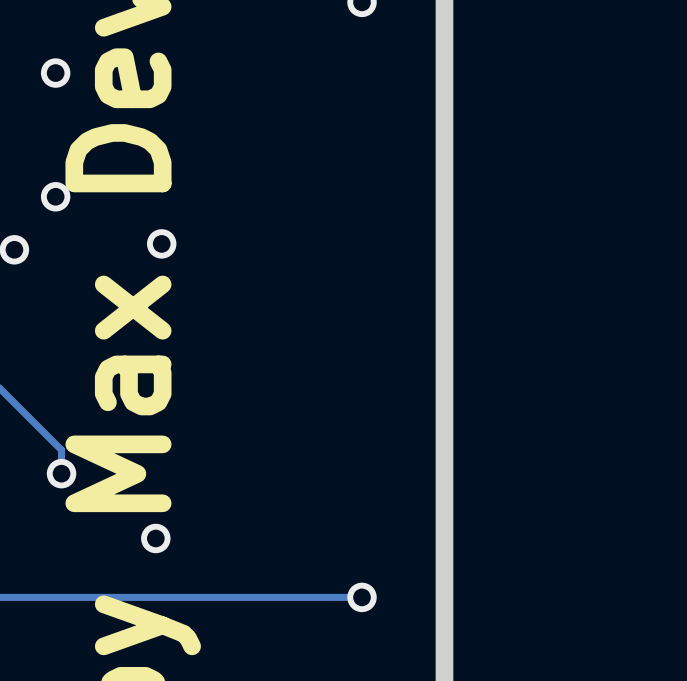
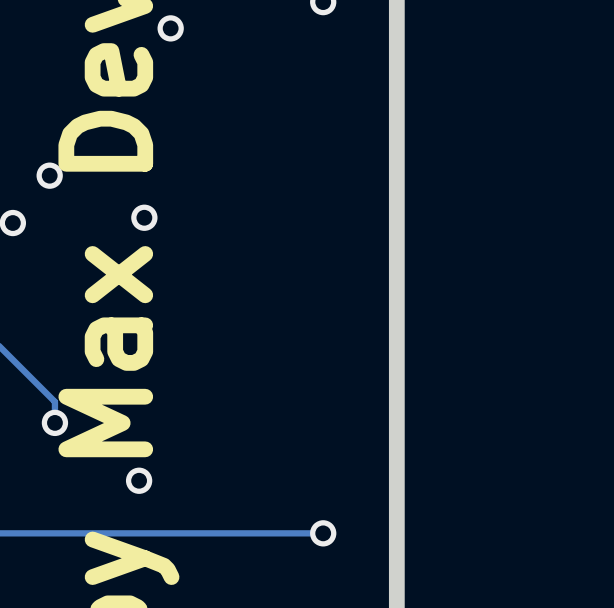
via: none -> (170, 28)
via: (55, 73) -> none

